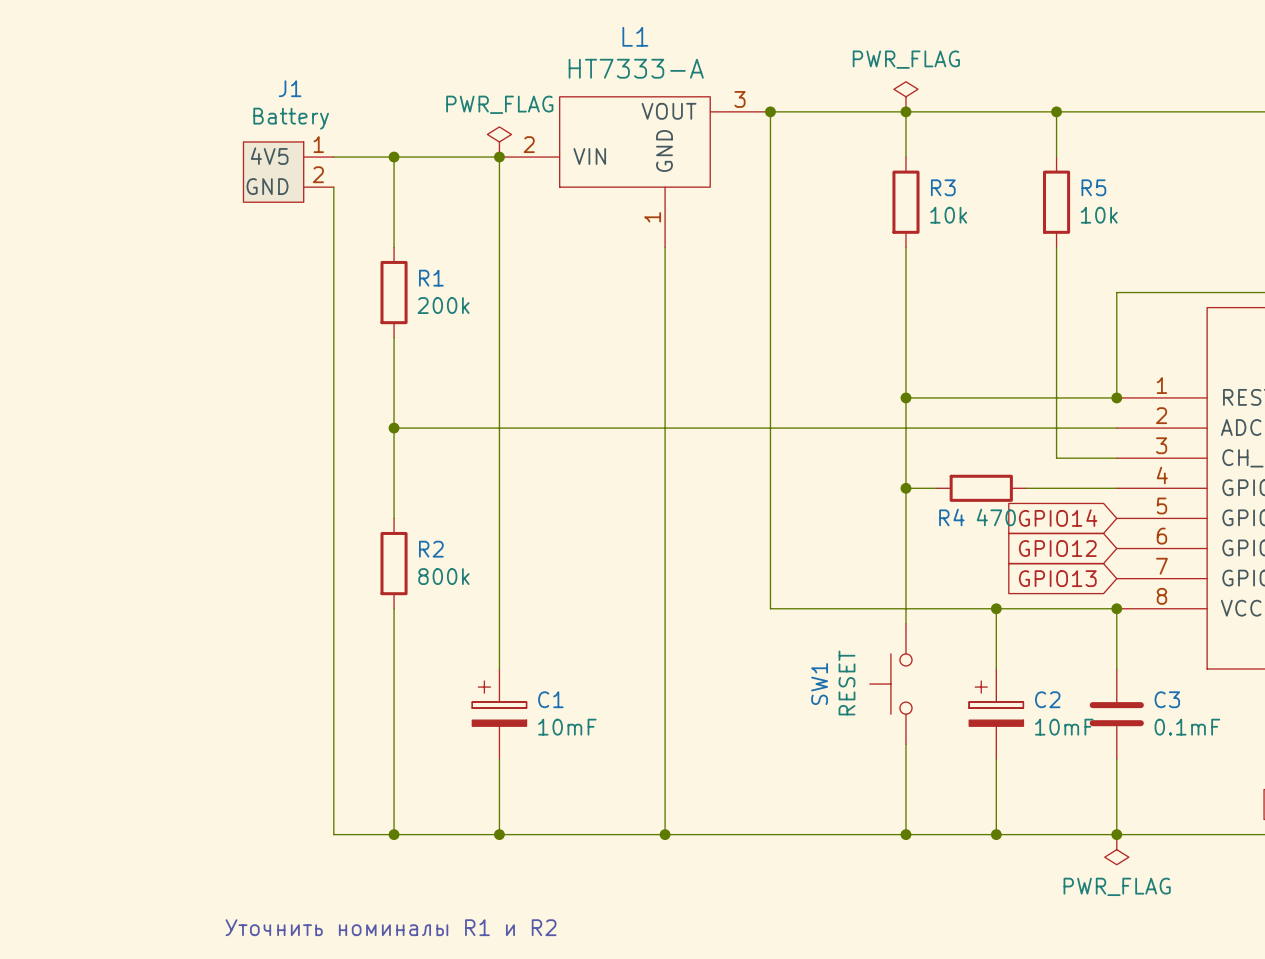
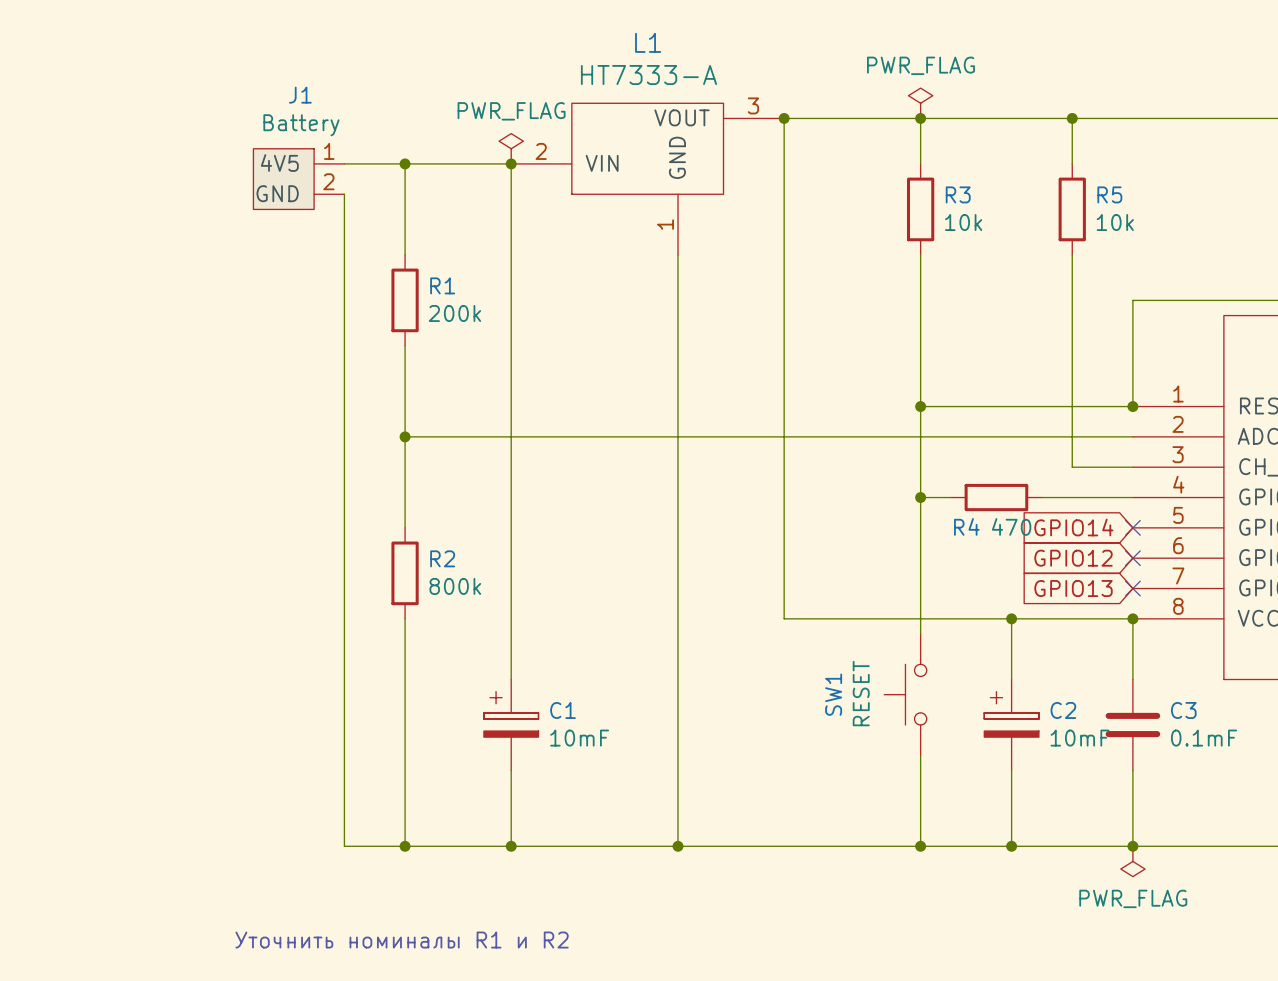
no-connect mark: none -> (1132, 527)
no-connect mark: none -> (1132, 558)
no-connect mark: none -> (1132, 588)

